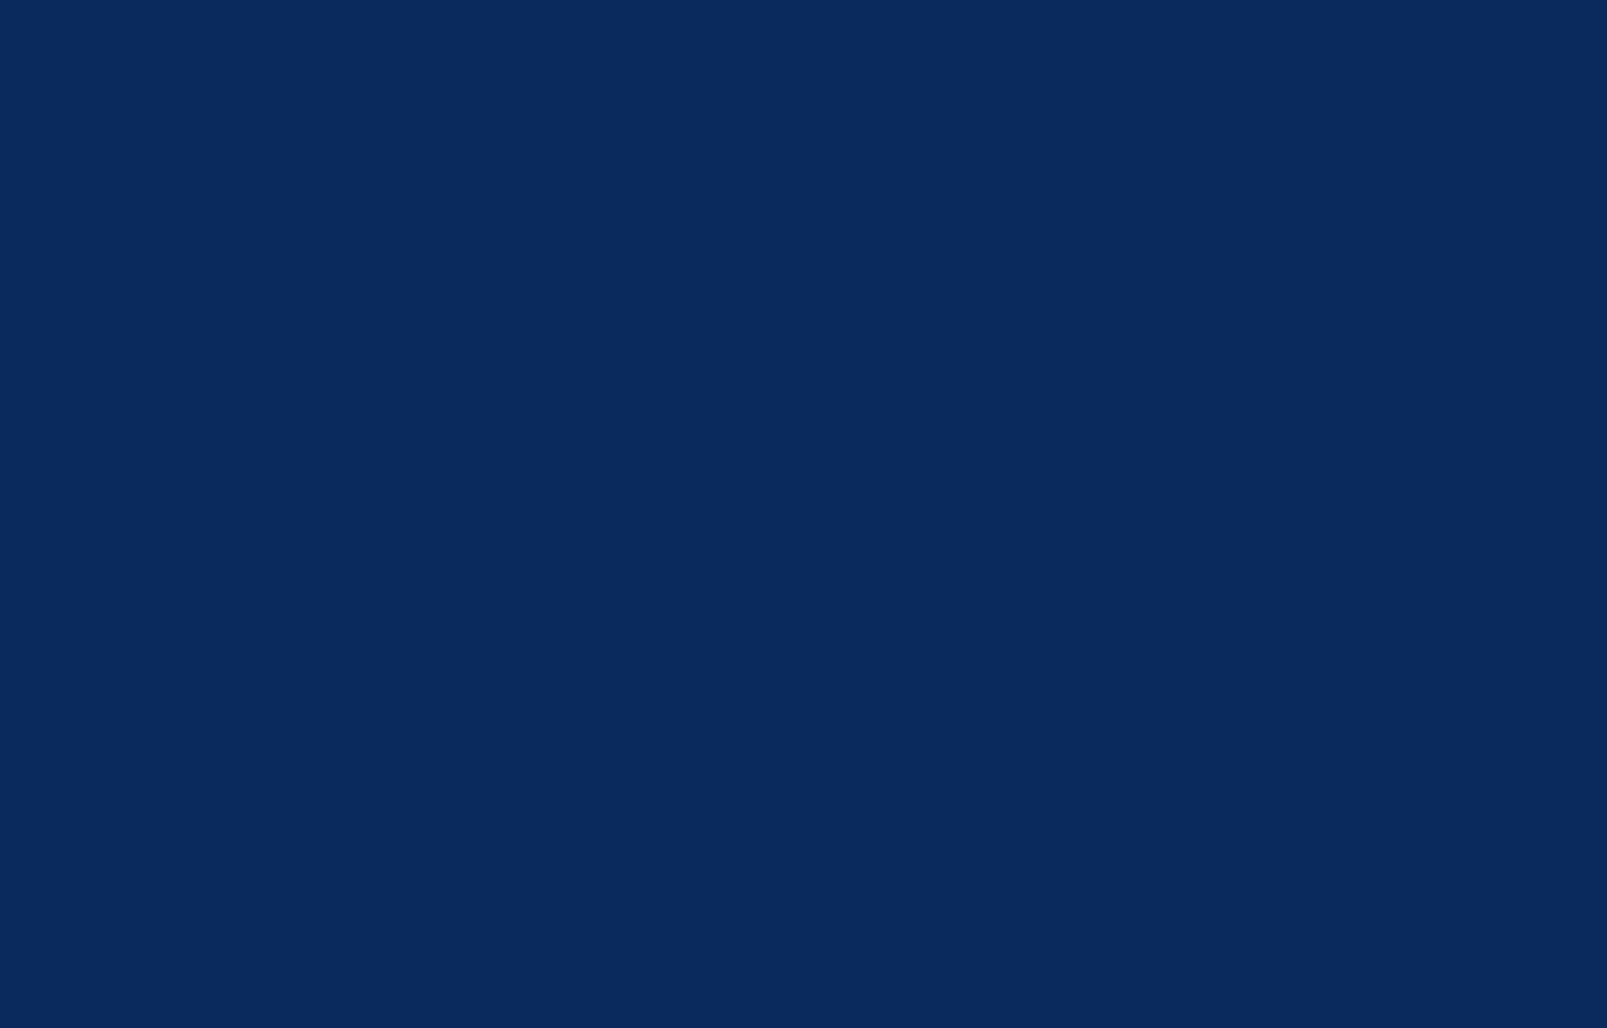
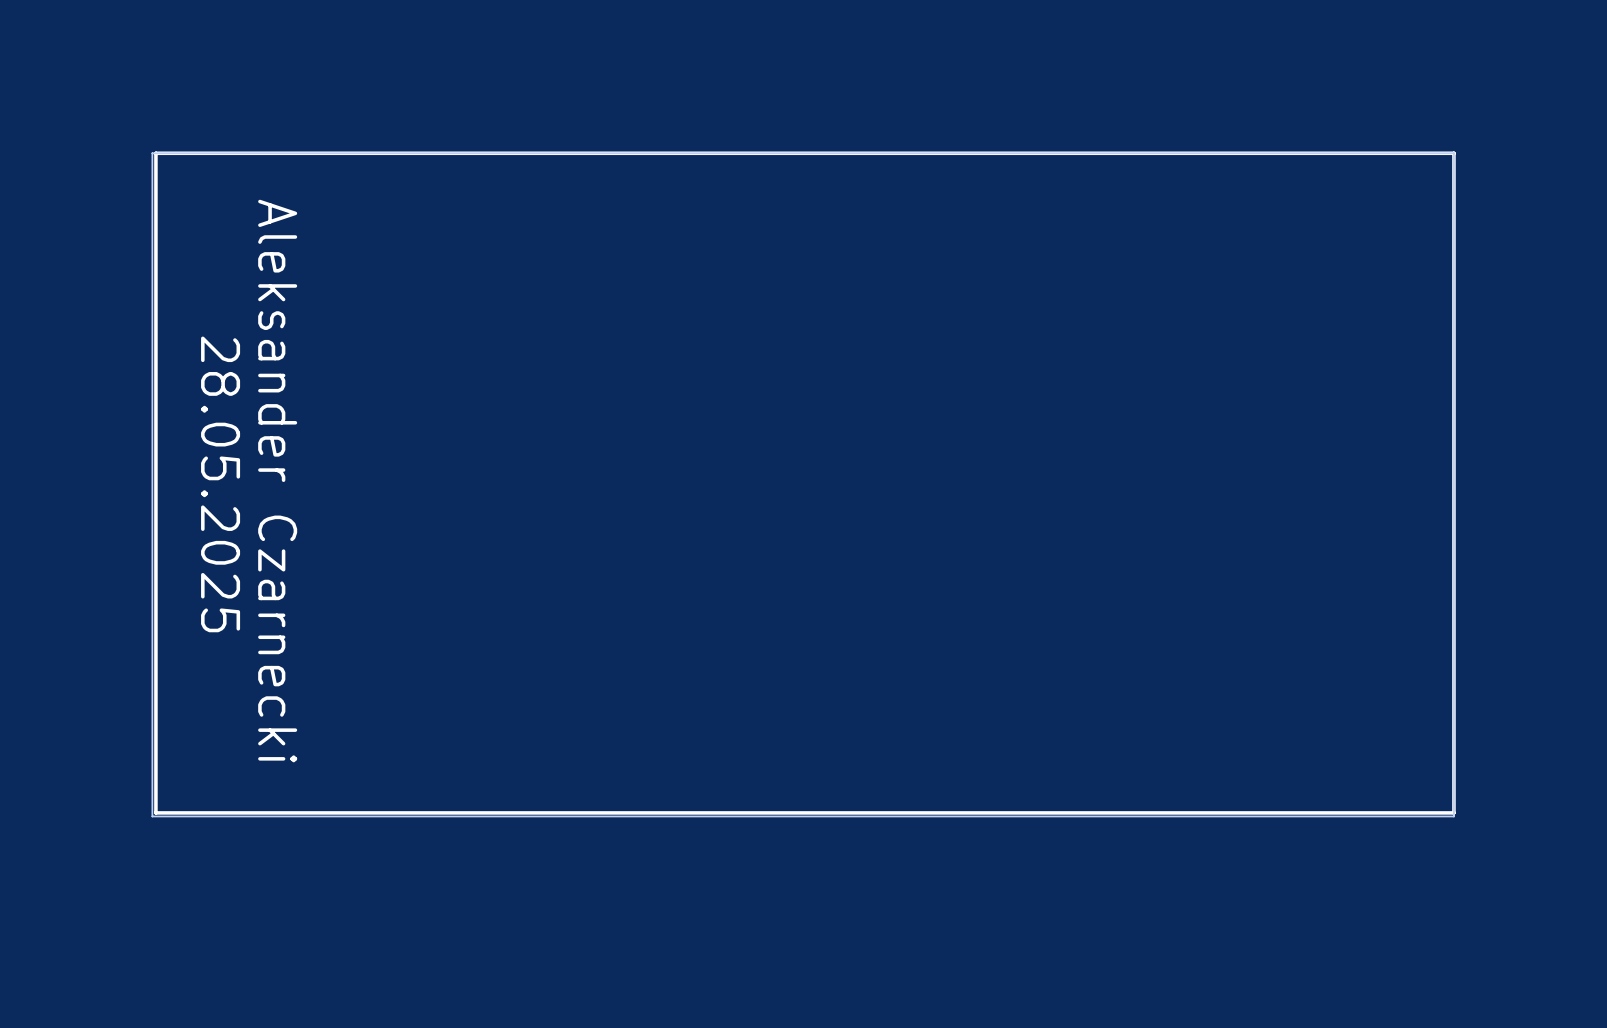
line: none -> (1453, 153) (155, 153) (155, 812) (1453, 812) (1453, 153)
board edge: none -> (1453, 153) (152, 153) (152, 816) (1453, 816) (1453, 153)
text: none -> Aleksander Czarnecki (277, 481)
text: none -> 28.05.2025 (220, 484)

